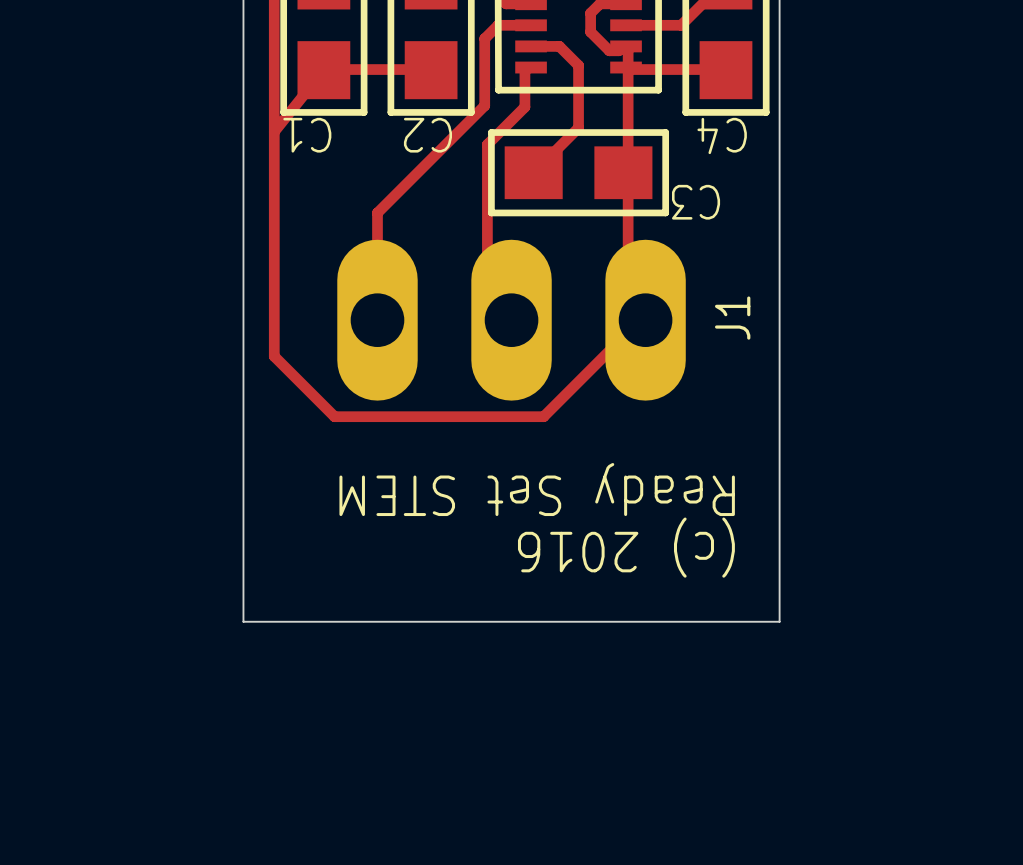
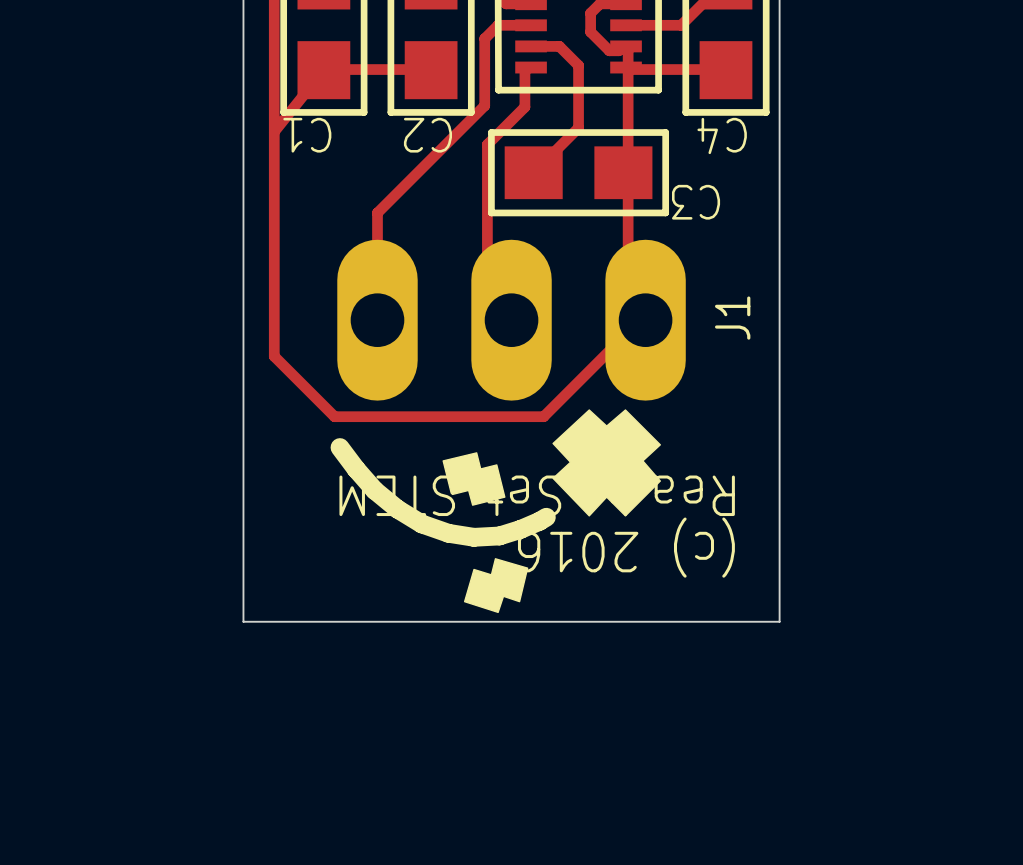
drawing: none -> [442, 409, 661, 614]
line: none -> (339, 447) (374, 490) (397, 509) (421, 523) (448, 533) (474, 537) (499, 535) (520, 529) (546, 517)

